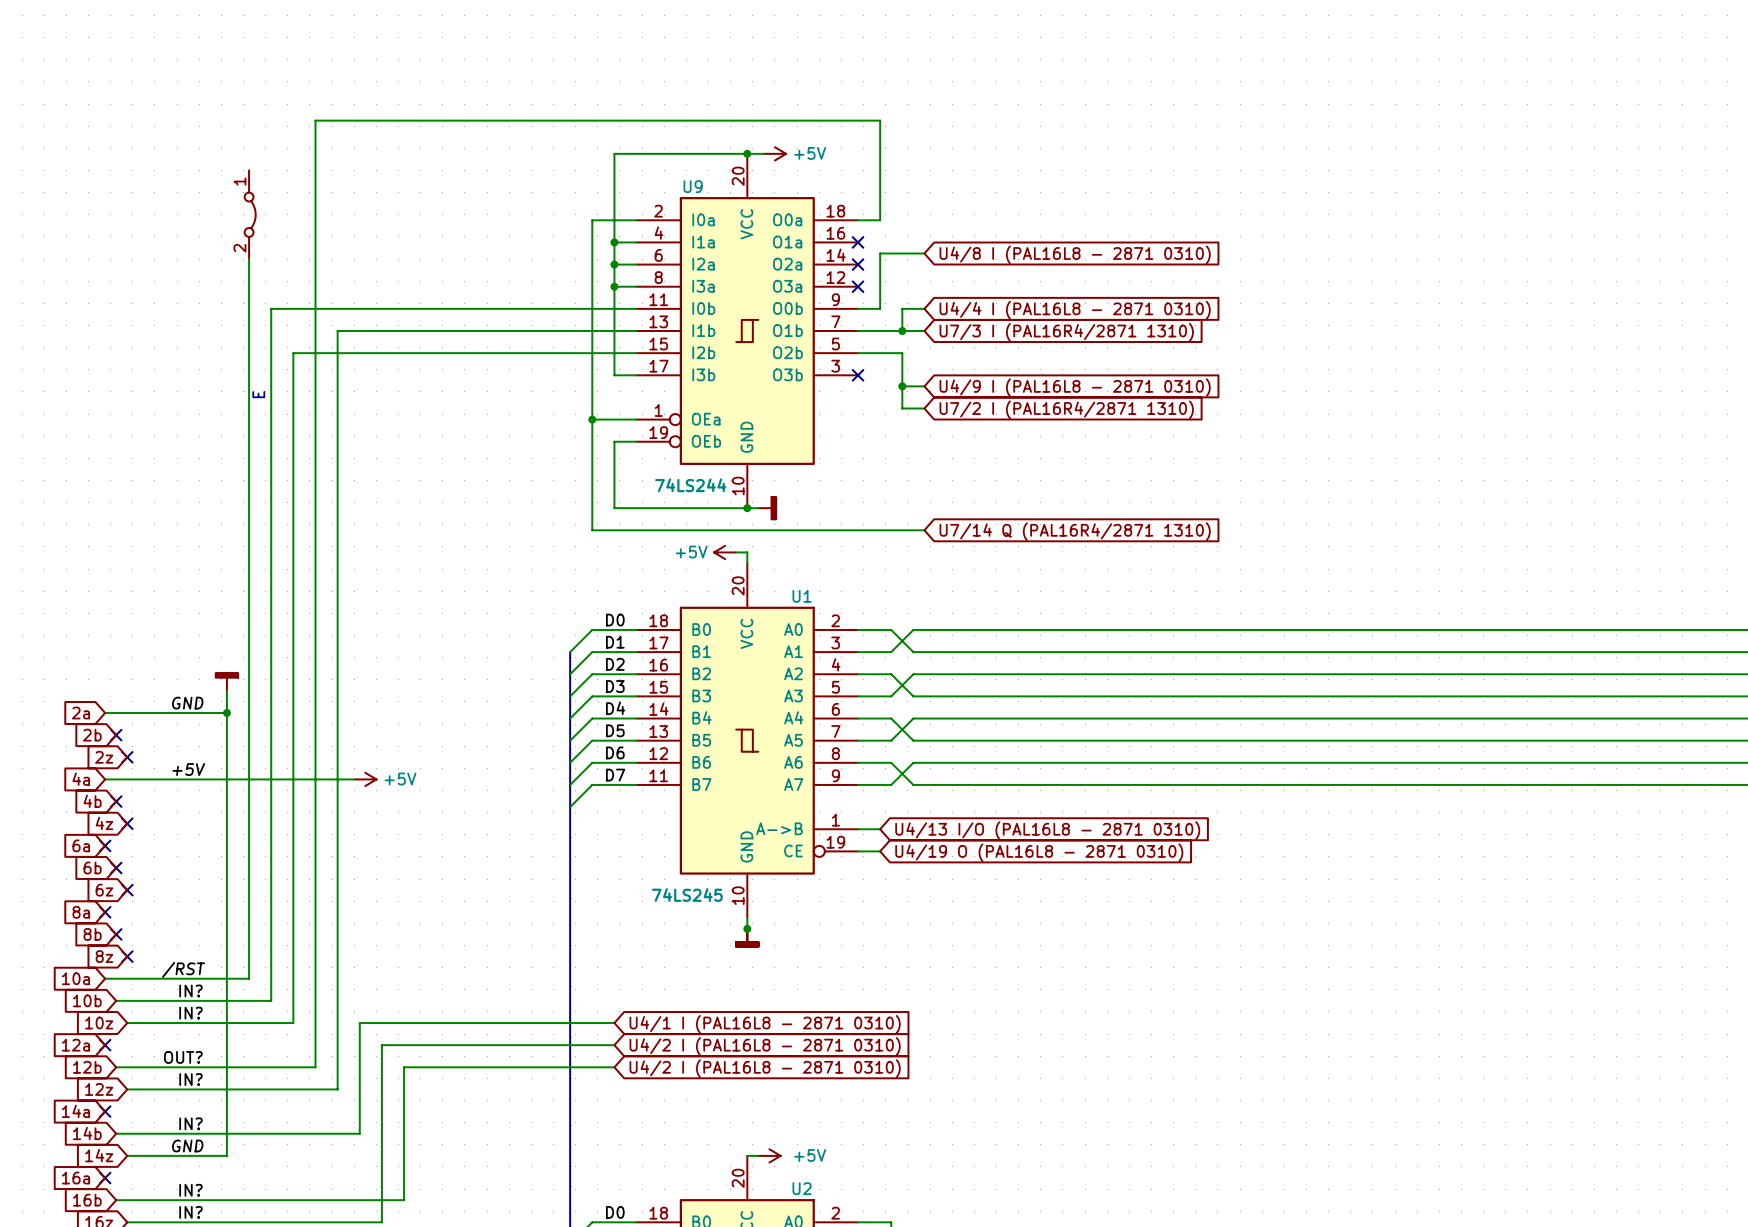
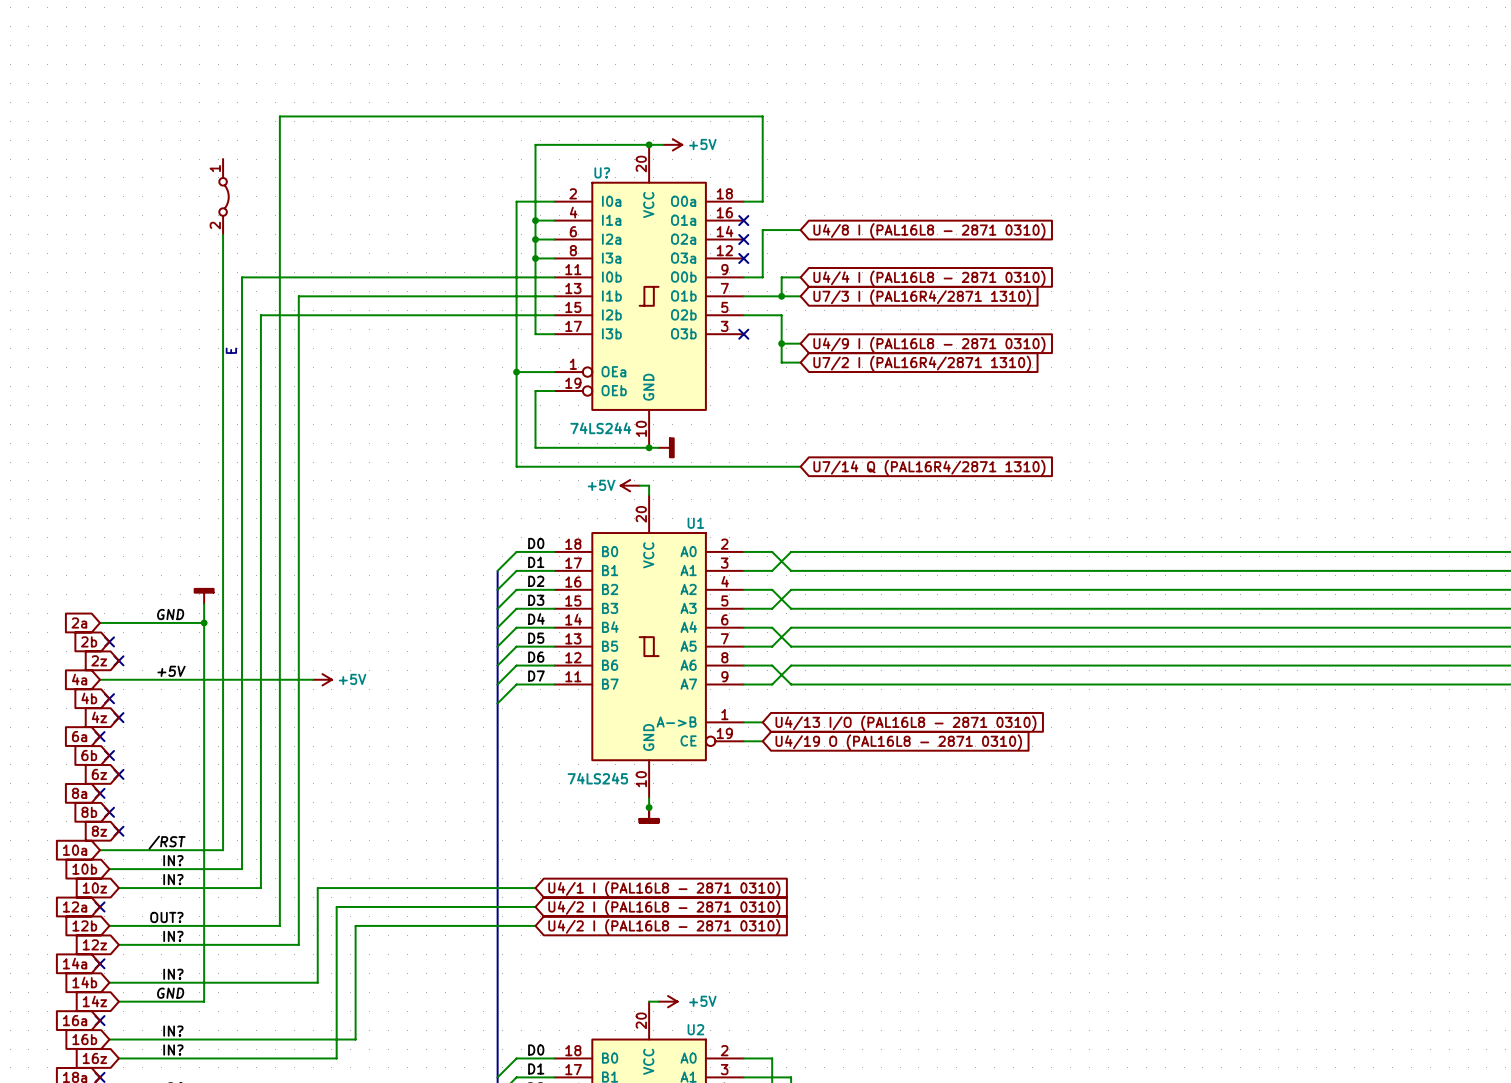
U9 name: U9 (693, 186) -> U? (602, 172)

